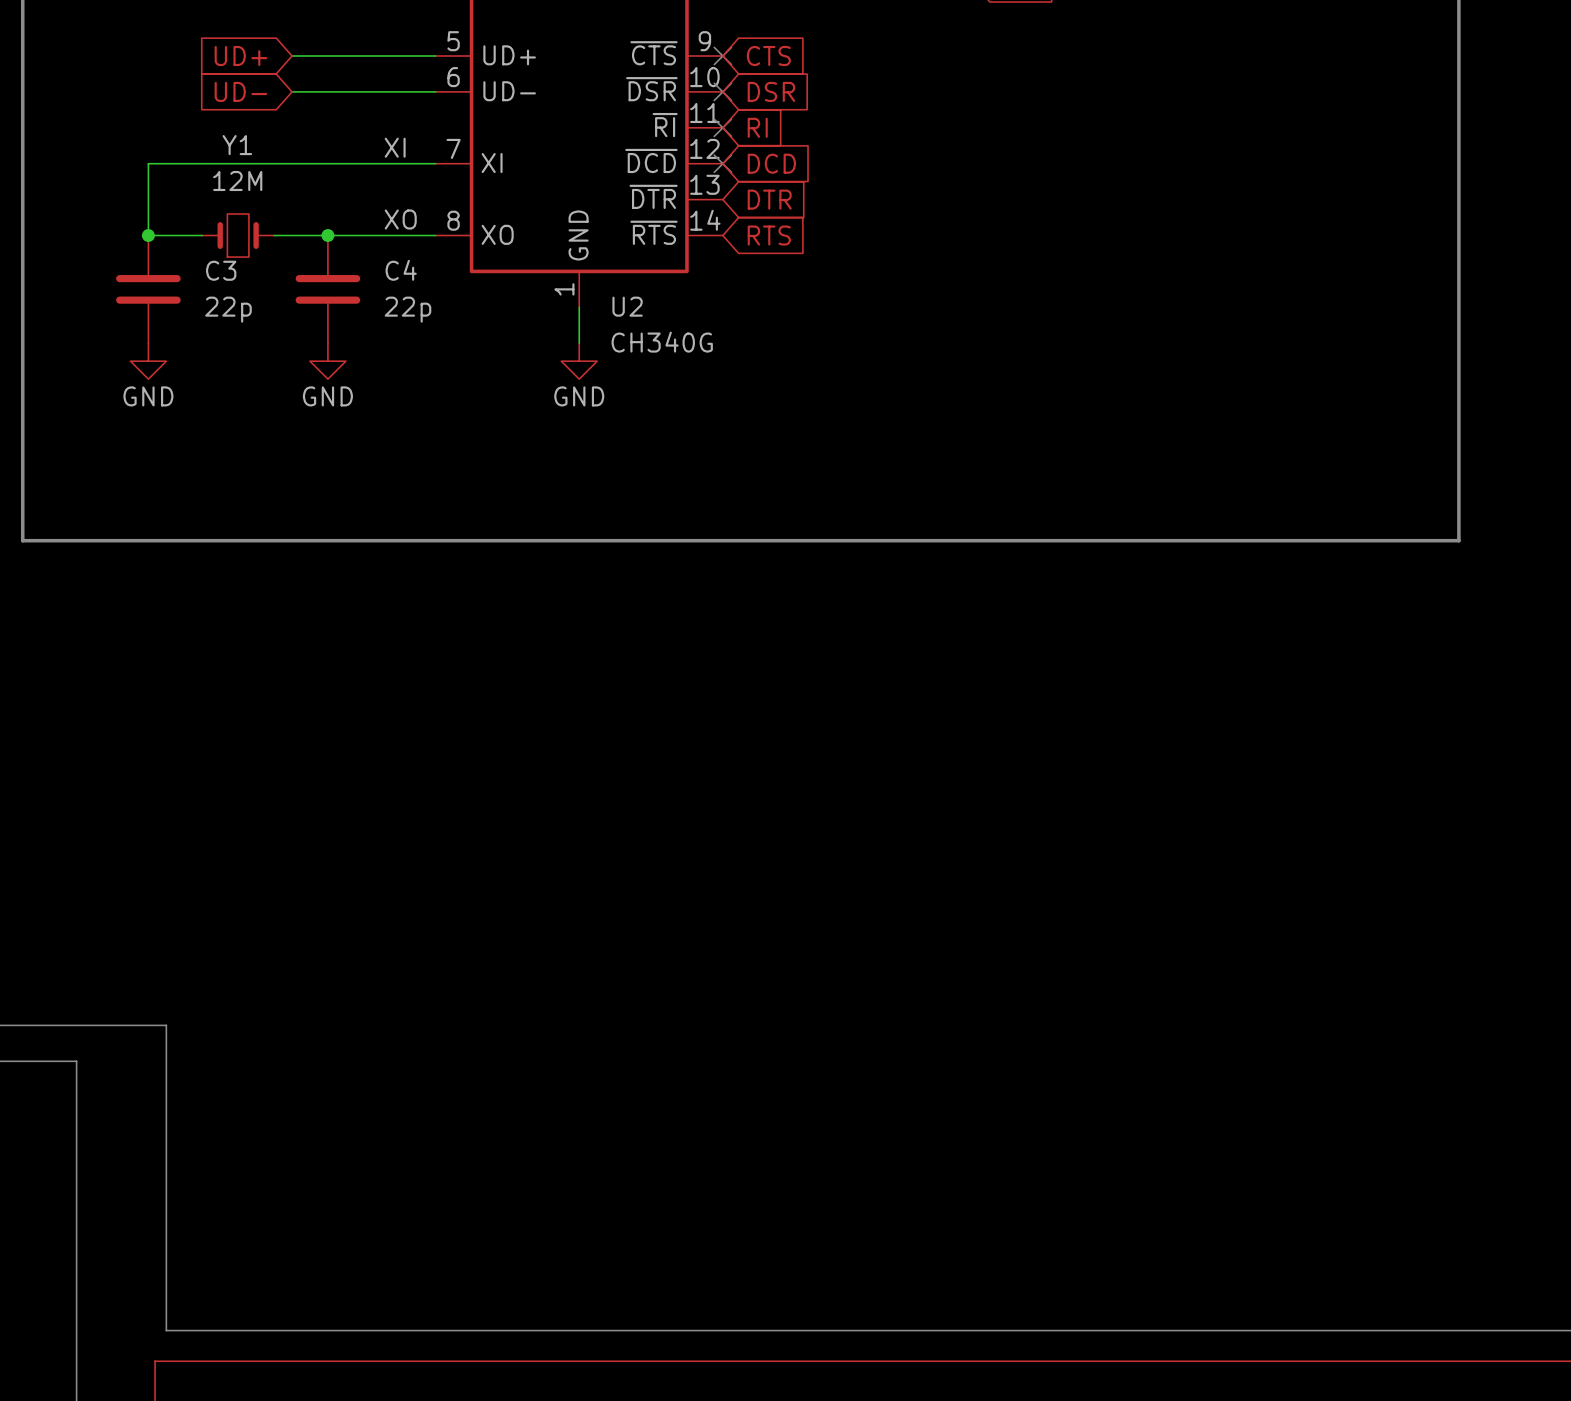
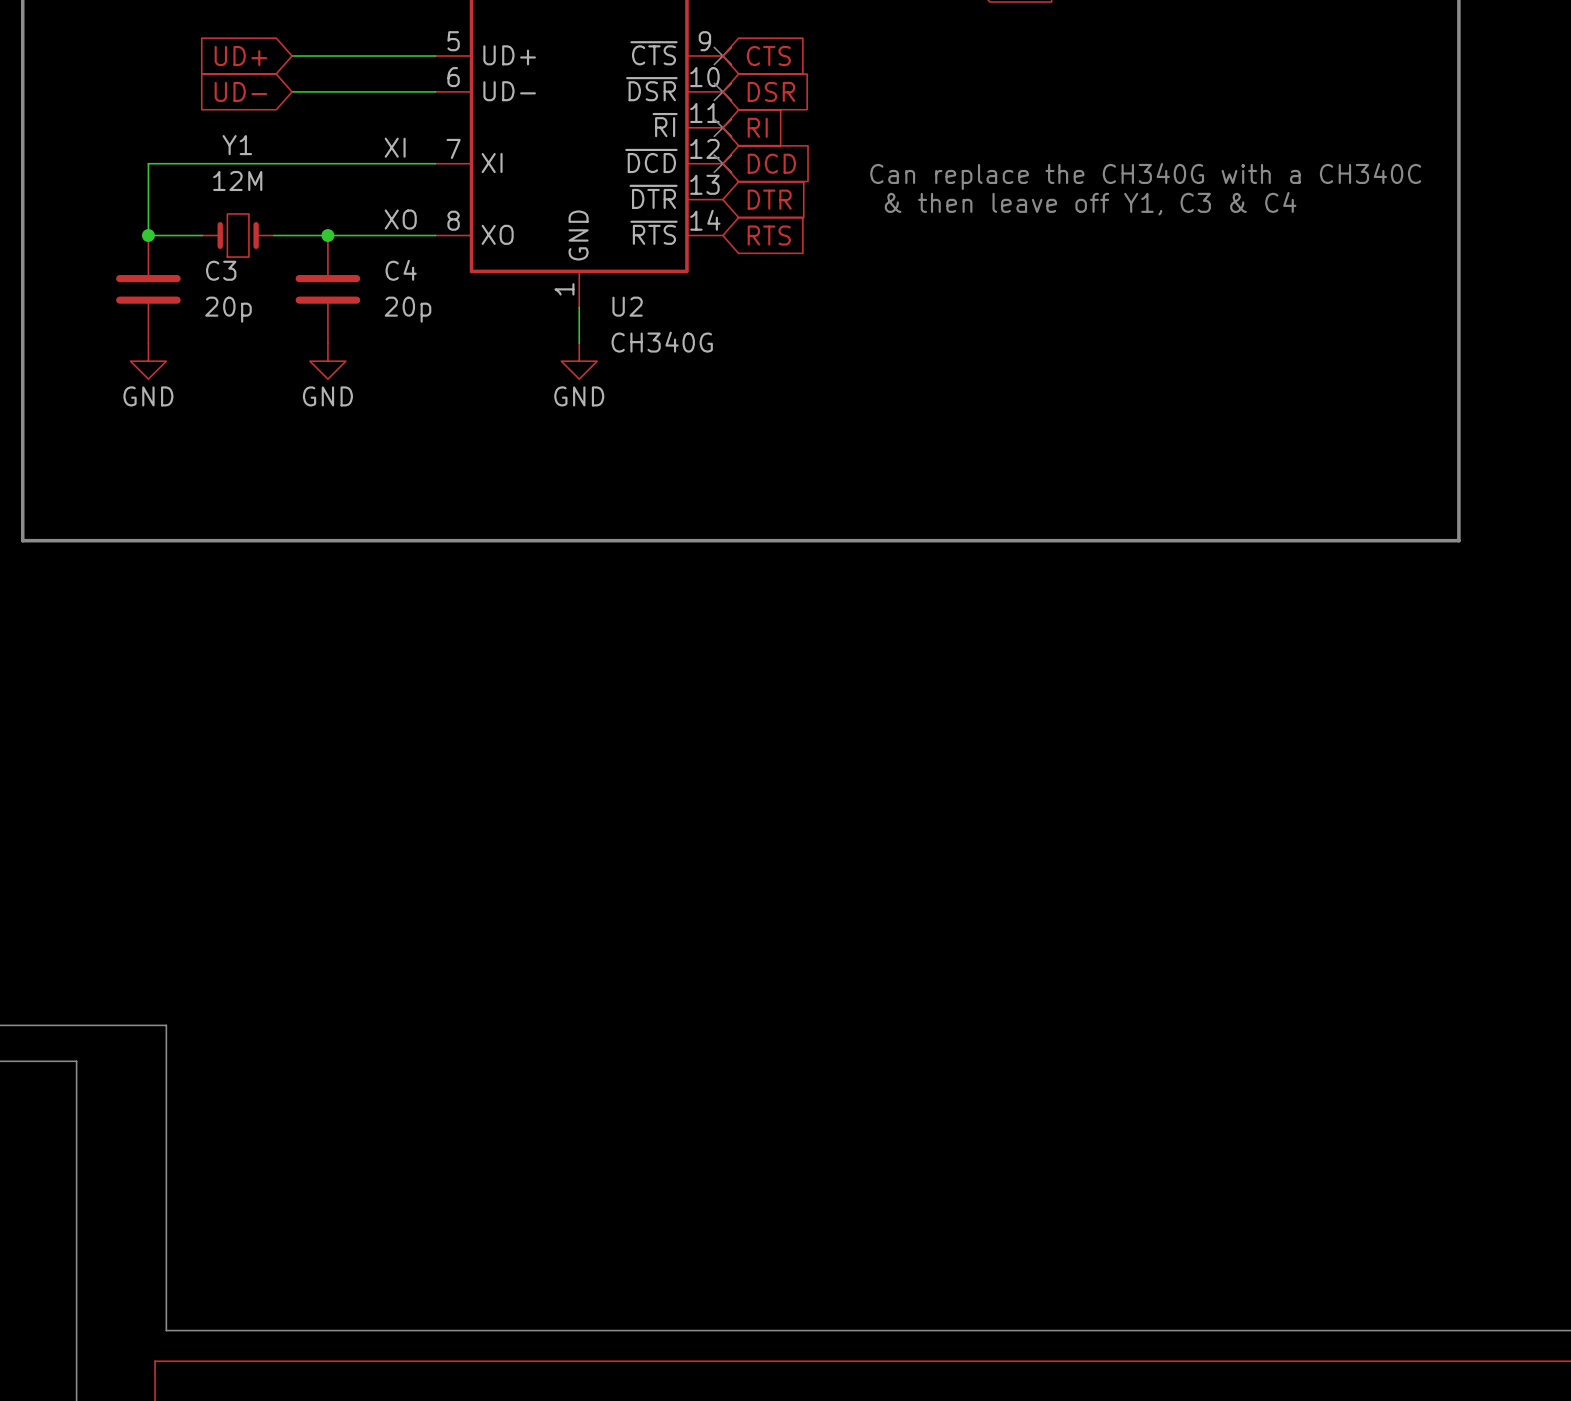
text: none -> Can replace the CH340G with a CH340C (1145, 176)
text: none -> & then leave off Y1, C3 & C4 (1090, 203)
C3 value: 22p (228, 309) -> 20p (228, 309)
C4 value: 22p (407, 309) -> 20p (407, 309)

